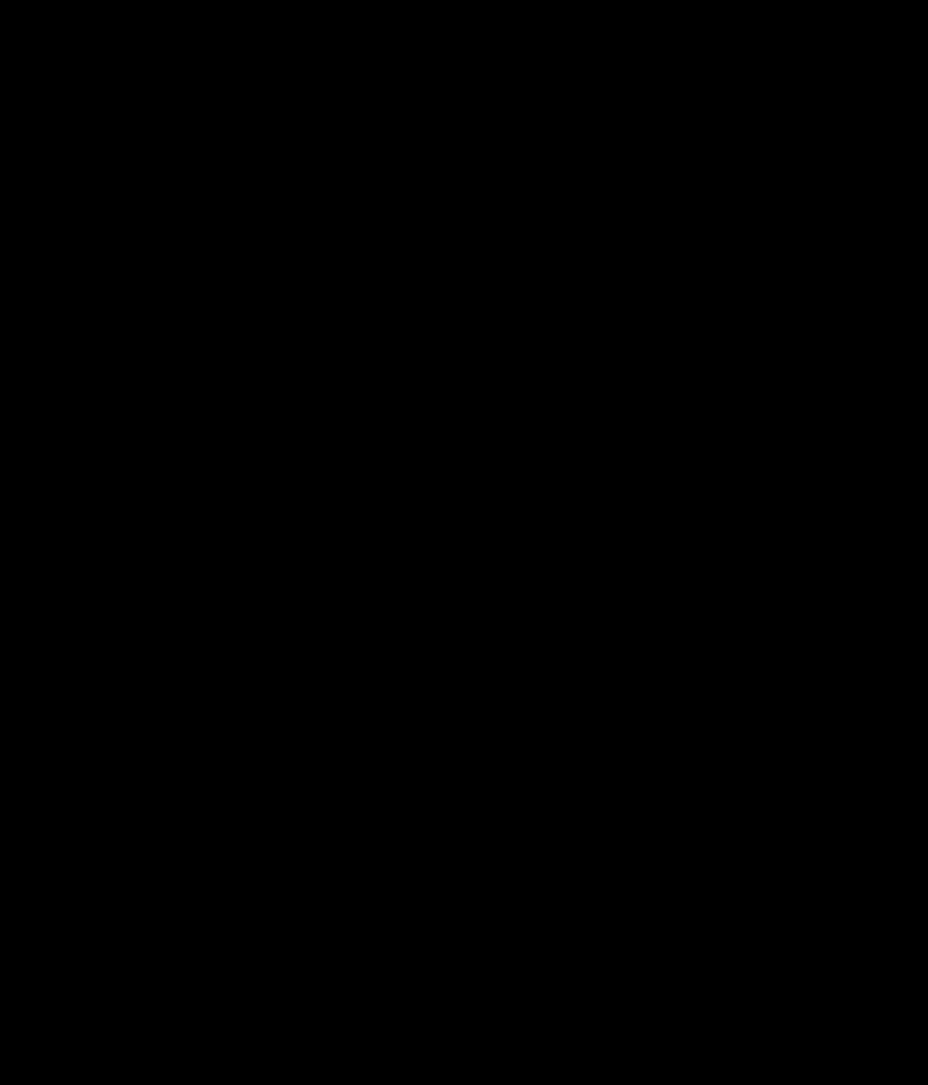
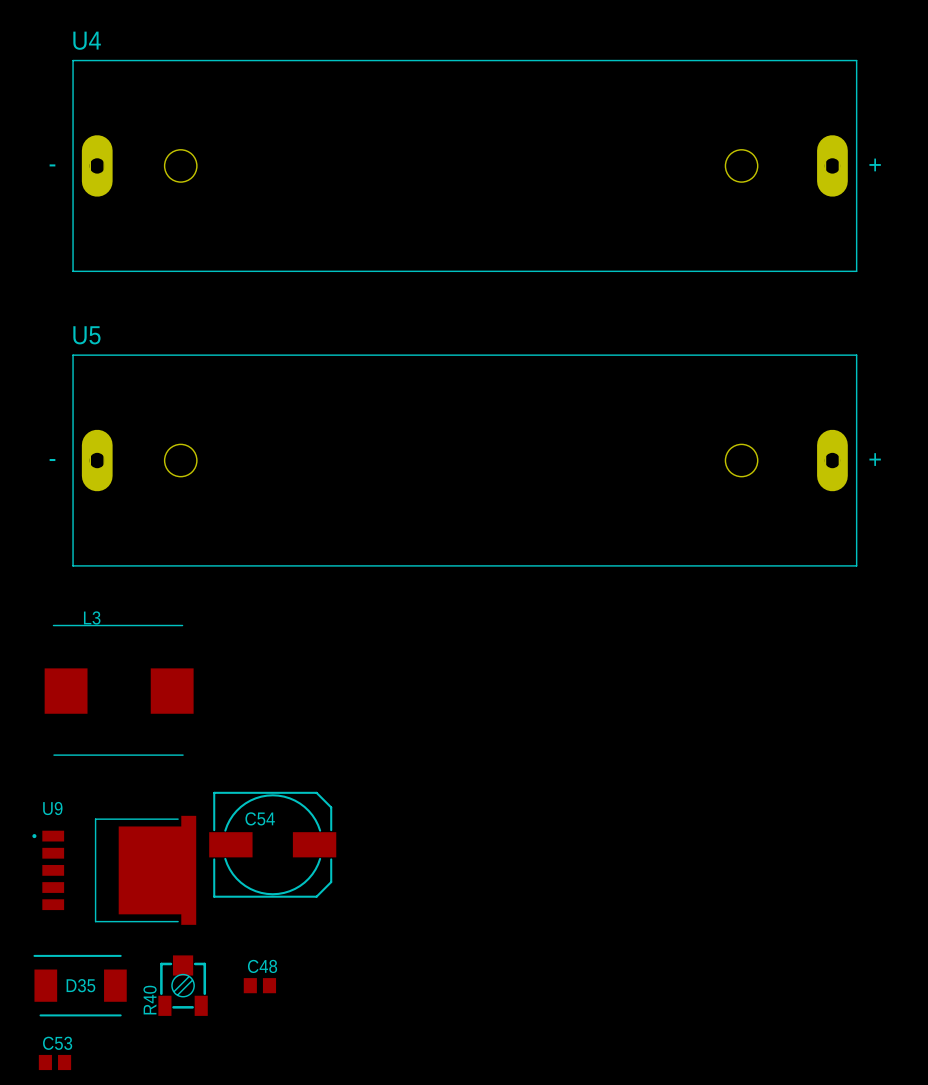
U4: none -> (464, 165)
U5: none -> (464, 460)
L3: none -> (119, 690)
C54: none -> (272, 844)
U9: none -> (114, 870)
D35: none -> (80, 985)
R40: none -> (183, 985)
C48: none -> (259, 985)
C53: none -> (54, 1062)

